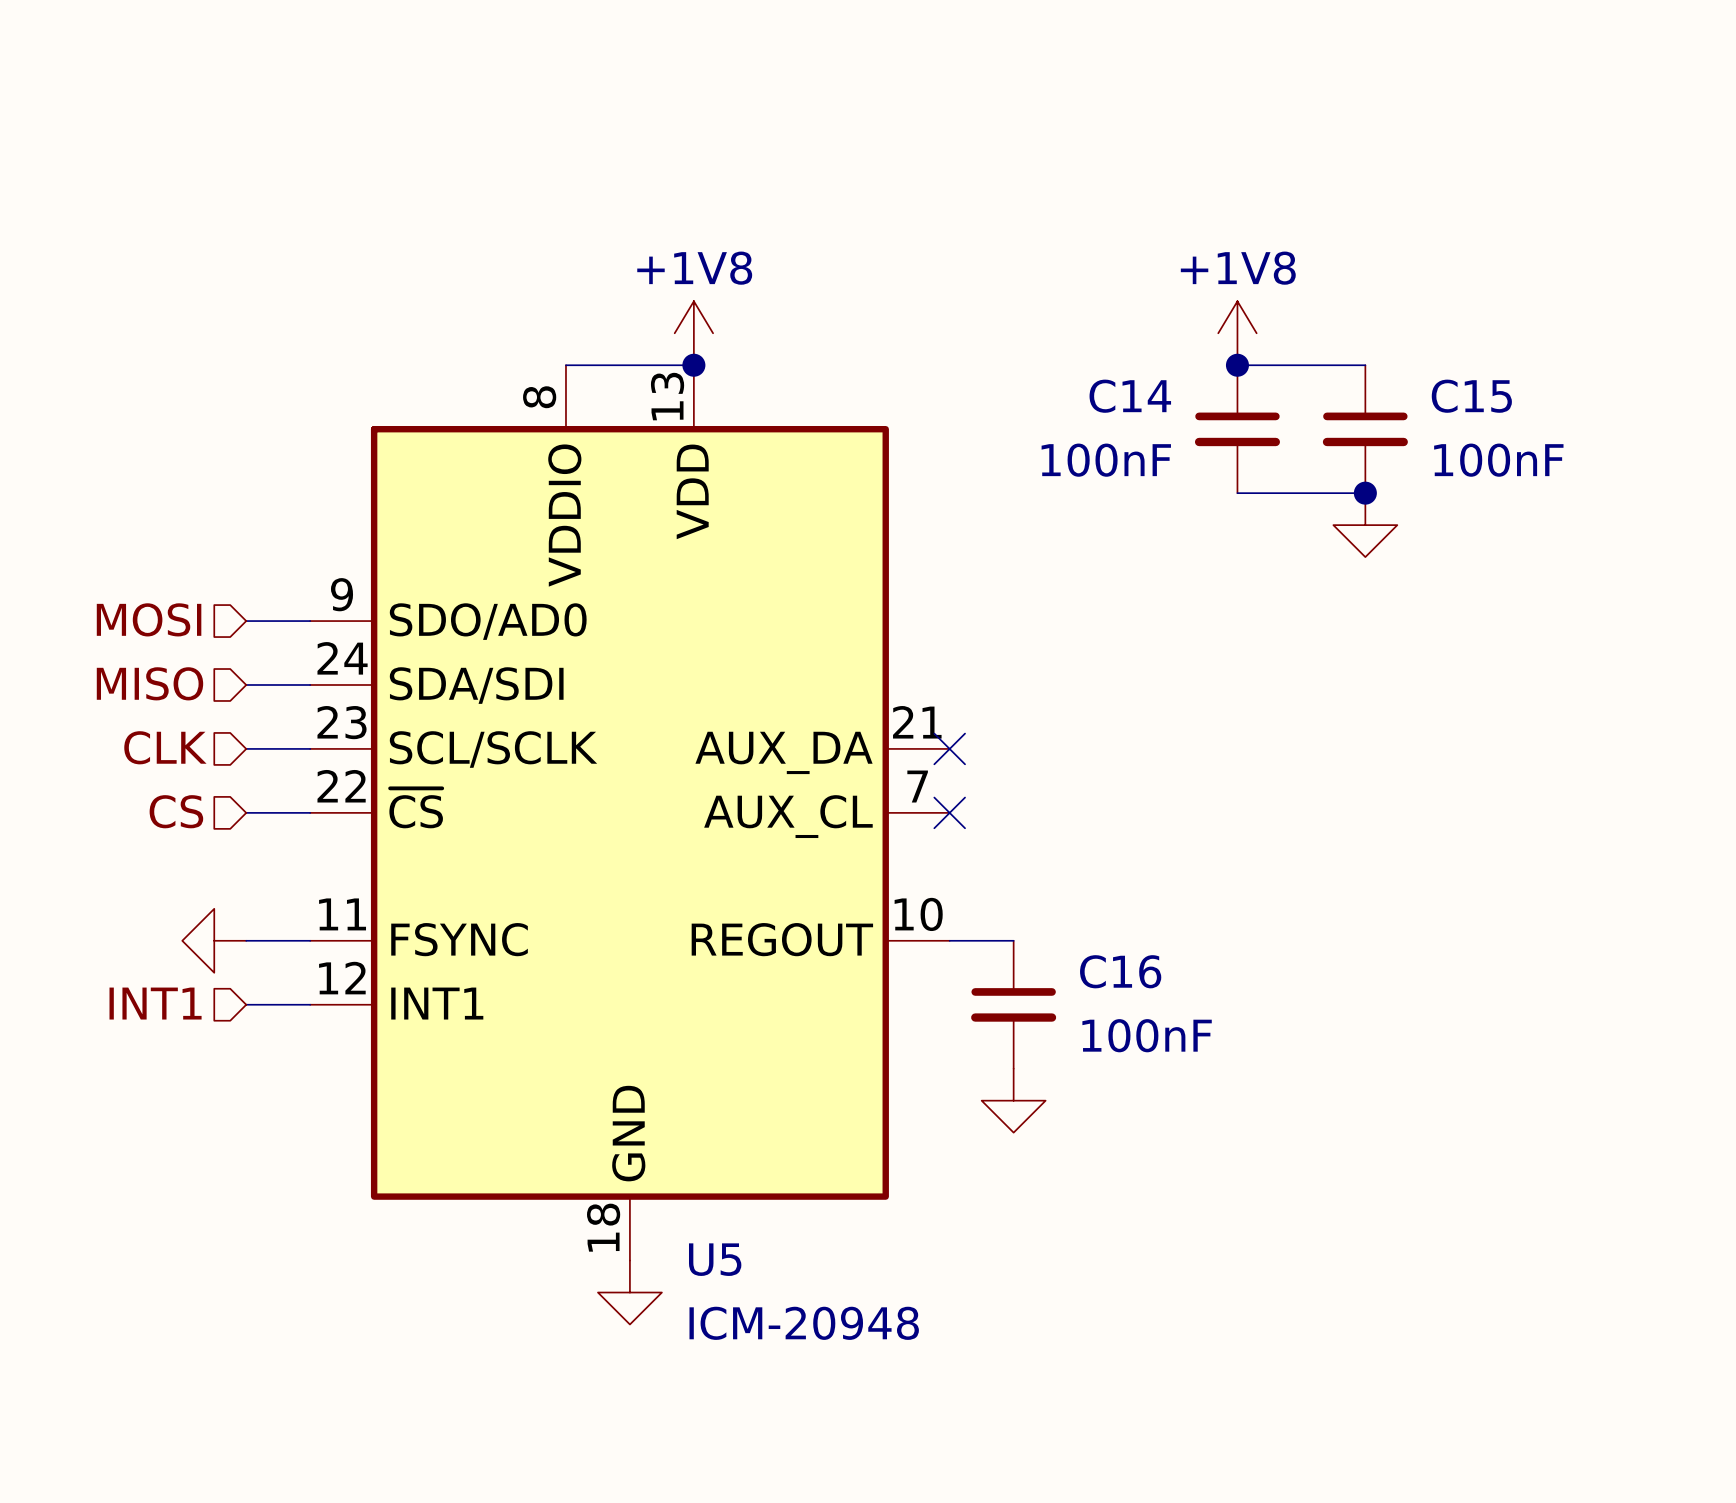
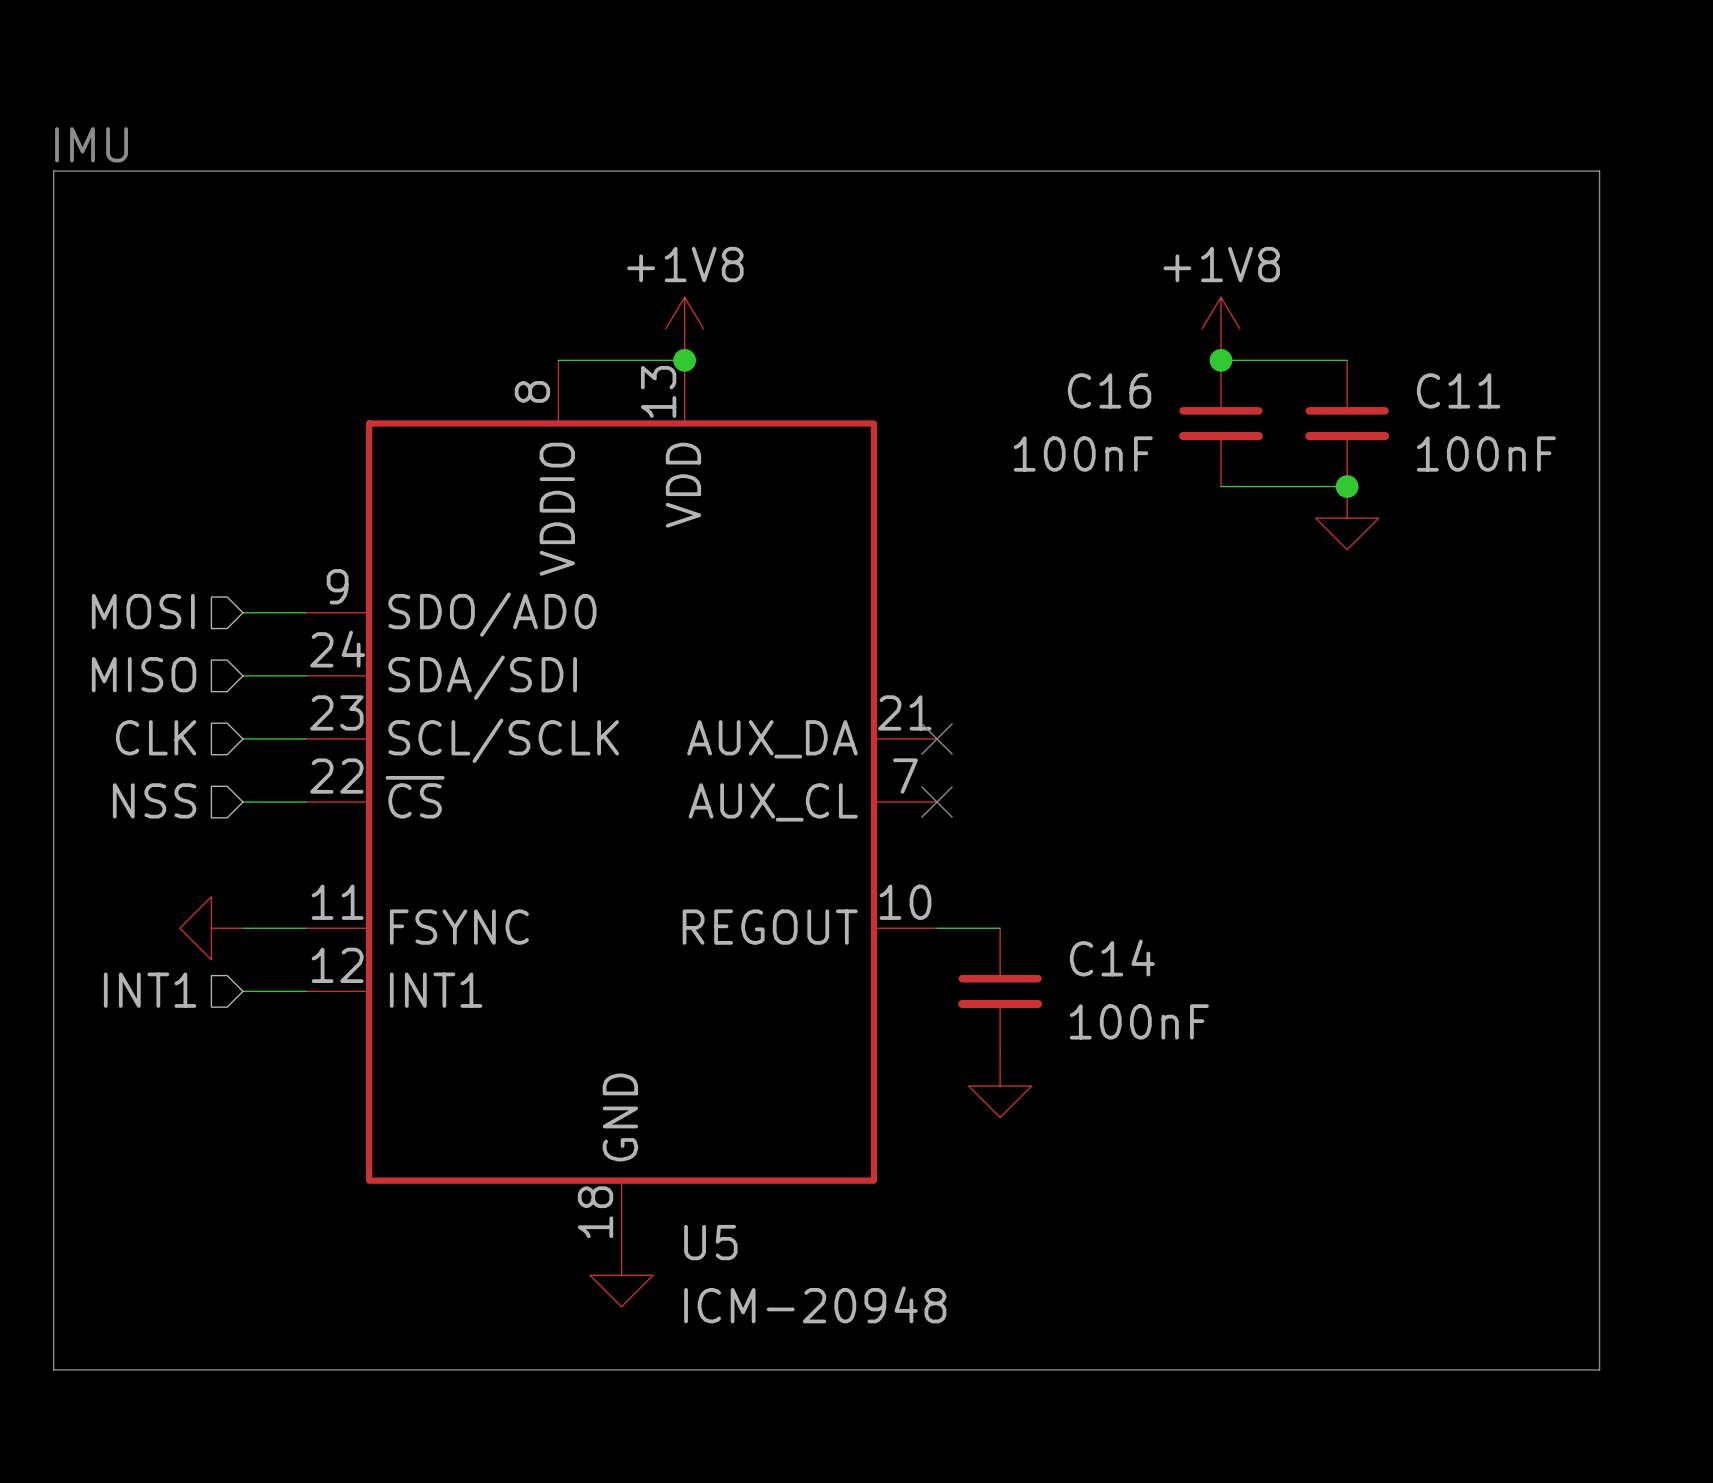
text: none -> IMU (91, 144)
line: none -> (53, 171) (1599, 171) (1599, 1369) (53, 1369) (53, 171)
C14 name: C14 (1130, 396) -> C16 (1109, 390)
C15 name: C15 (1471, 396) -> C11 (1458, 390)
hierarchical label: CS (176, 811) -> NSS (154, 800)
C16 name: C16 (1120, 971) -> C14 (1112, 958)

